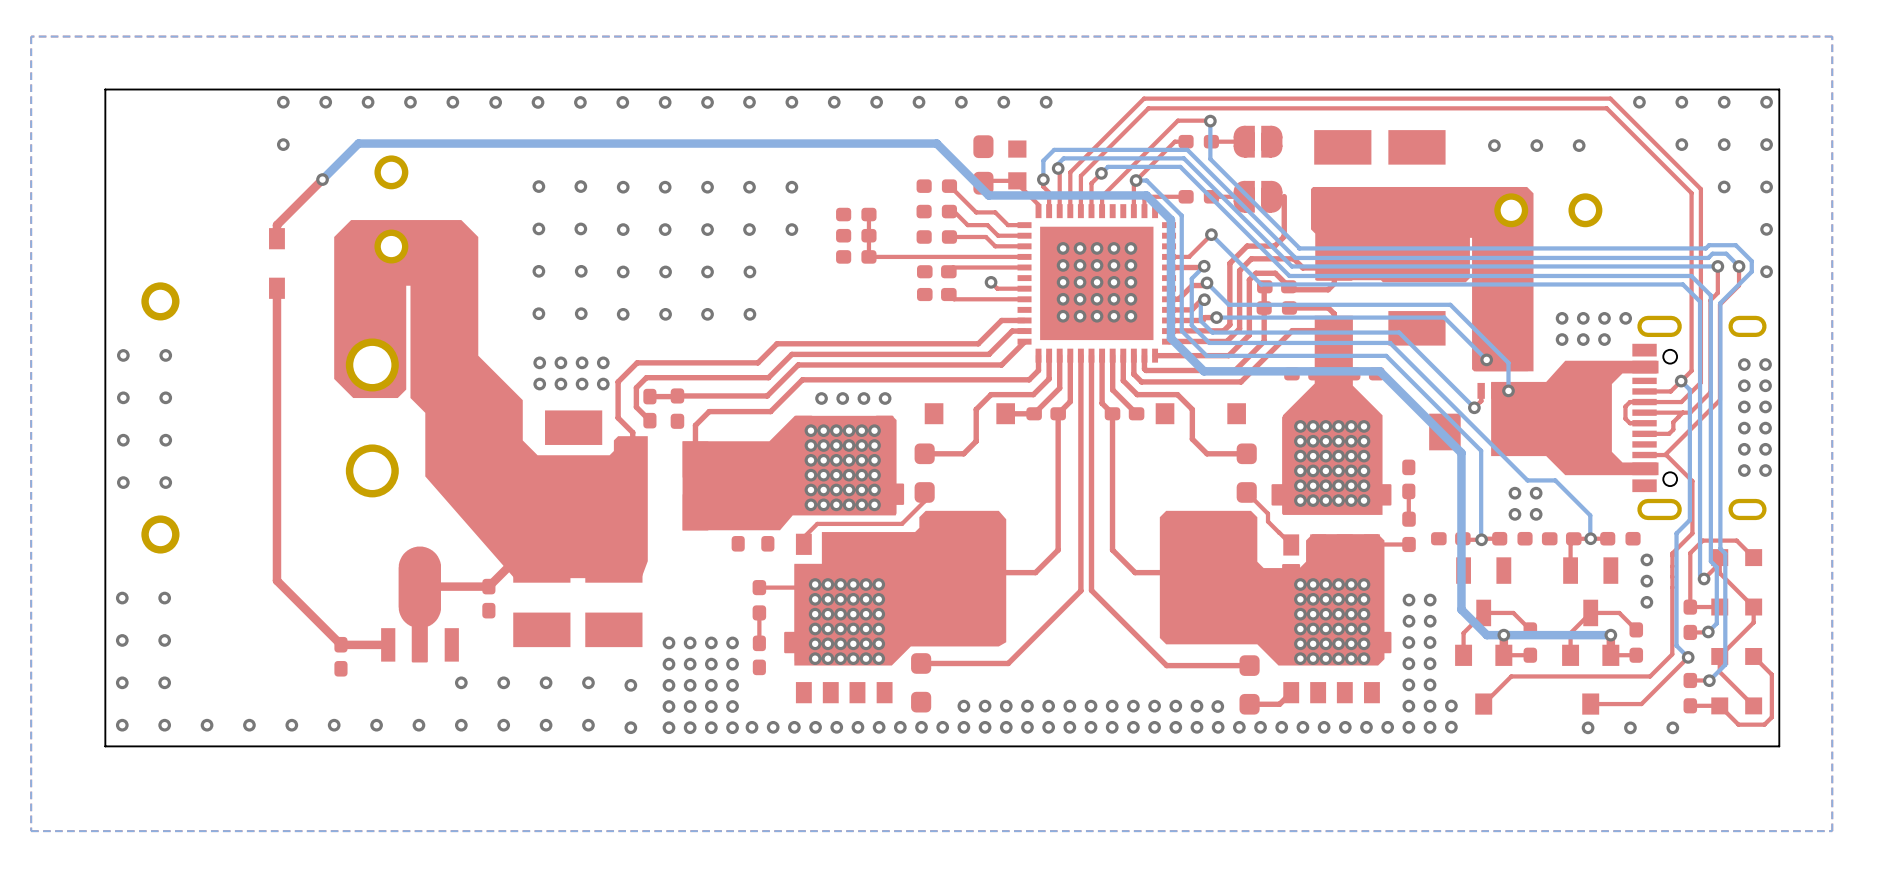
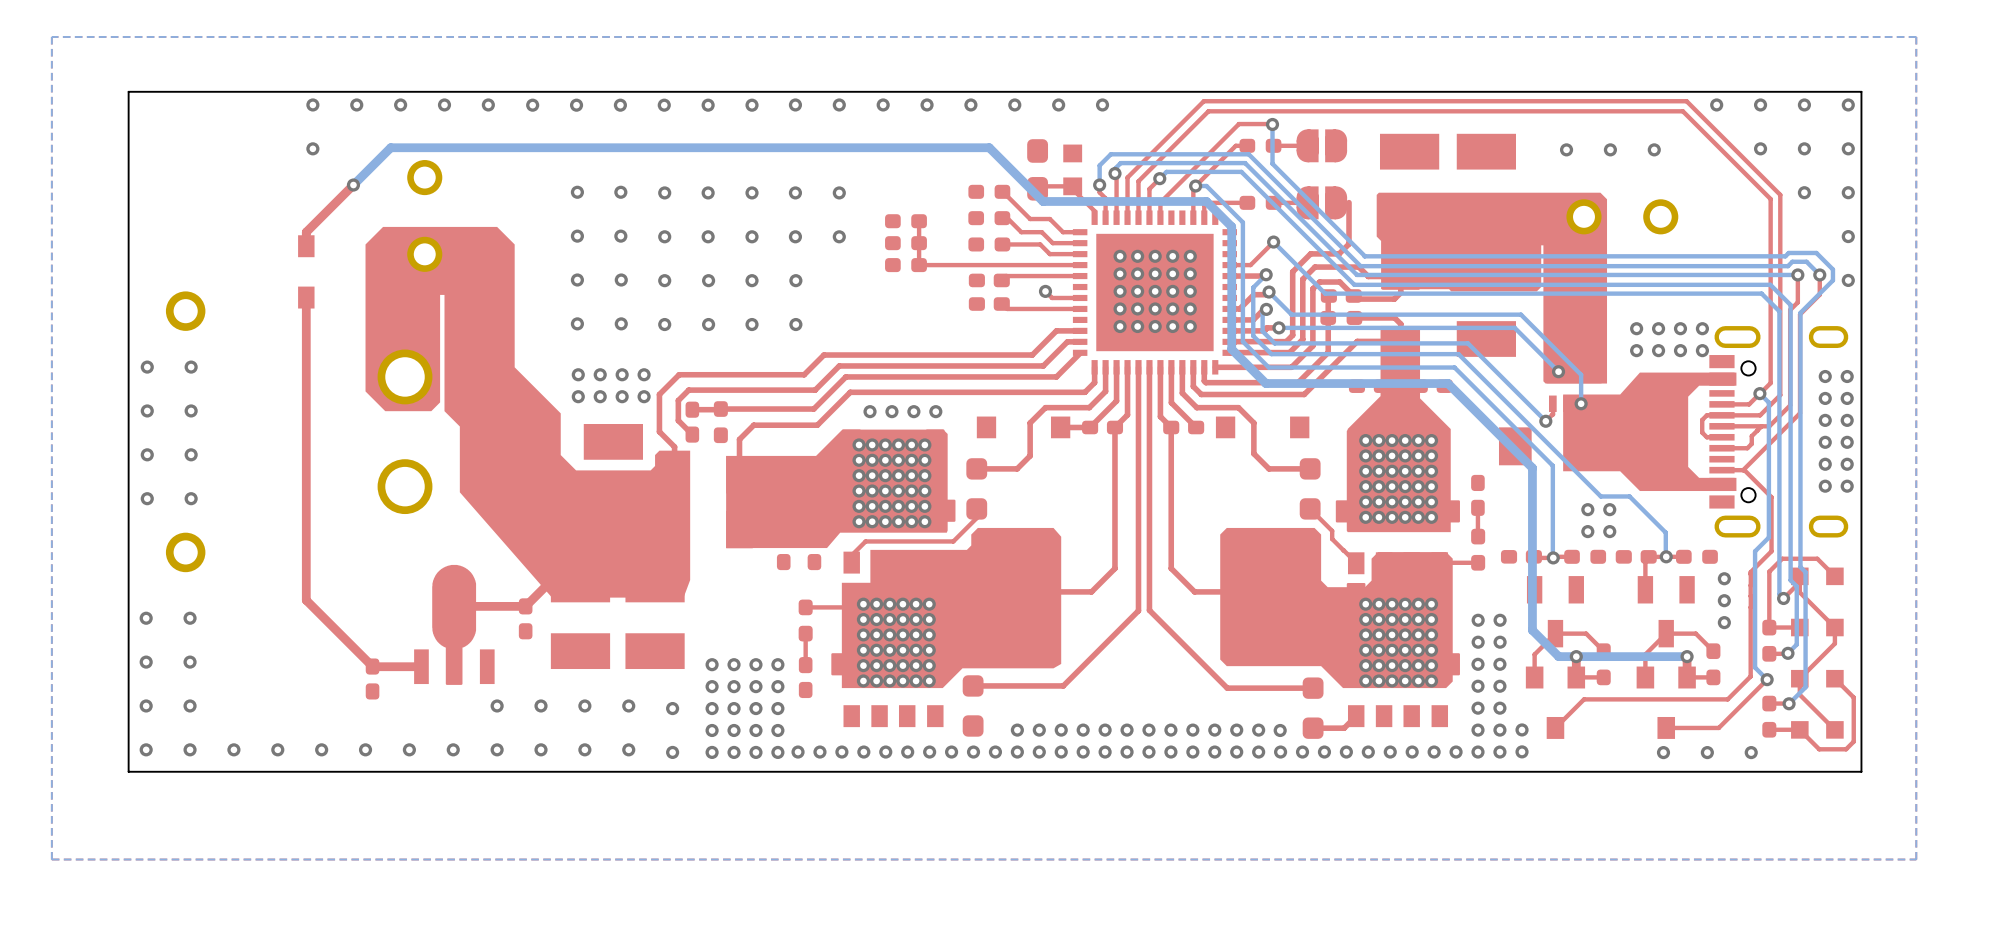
via: none -> (1702, 350)

